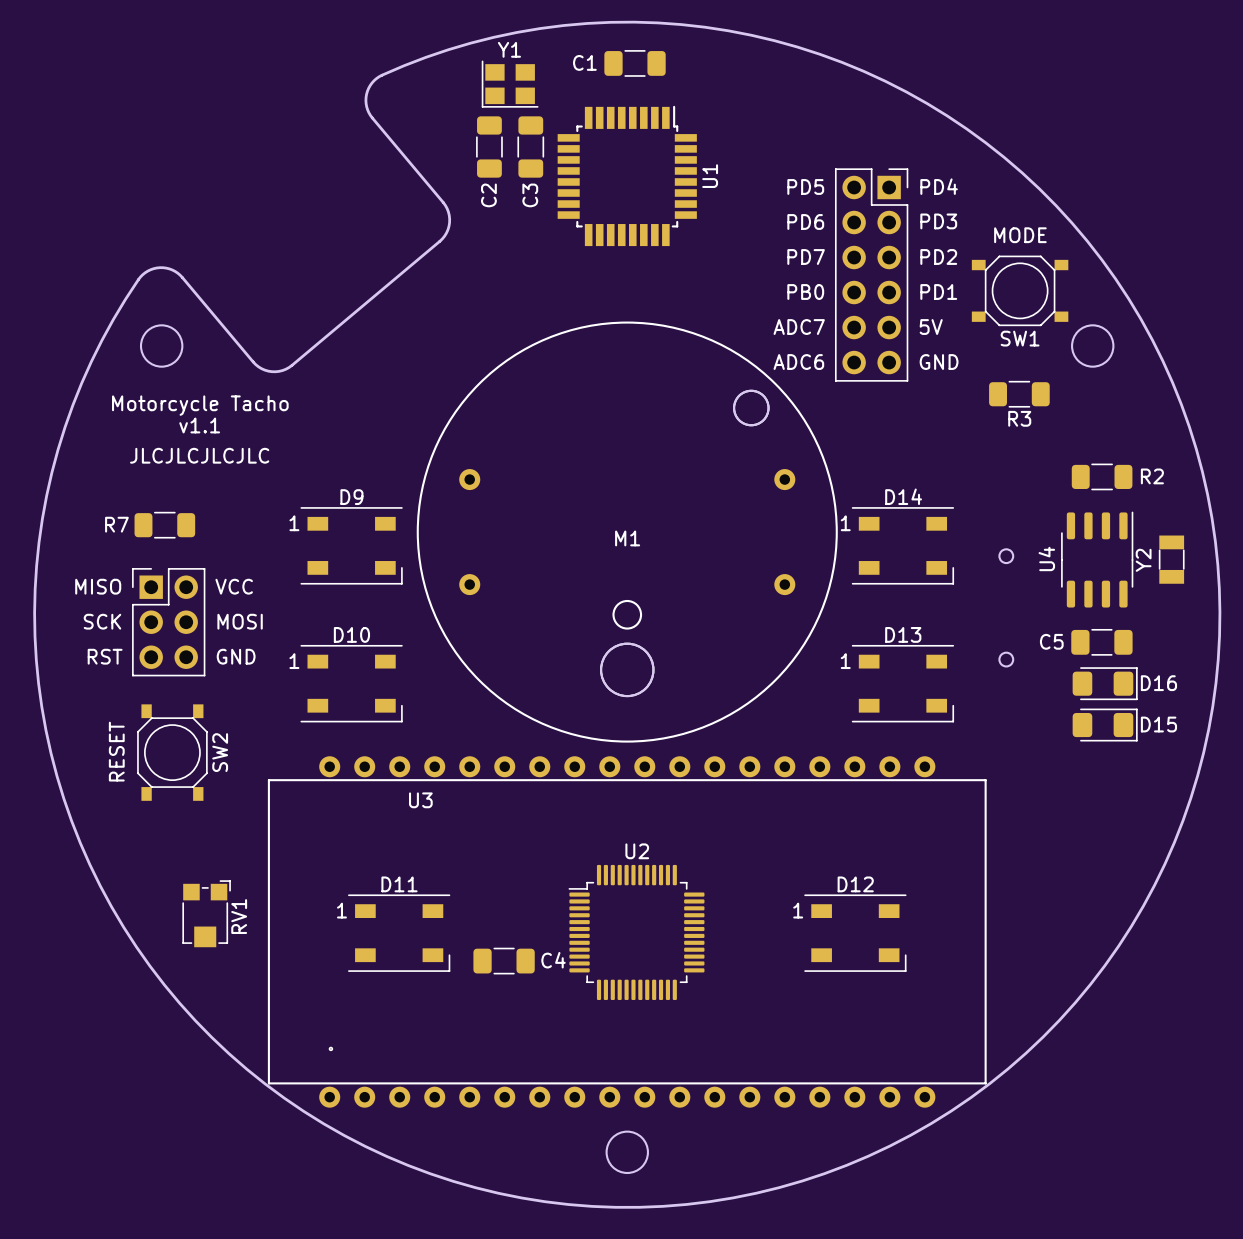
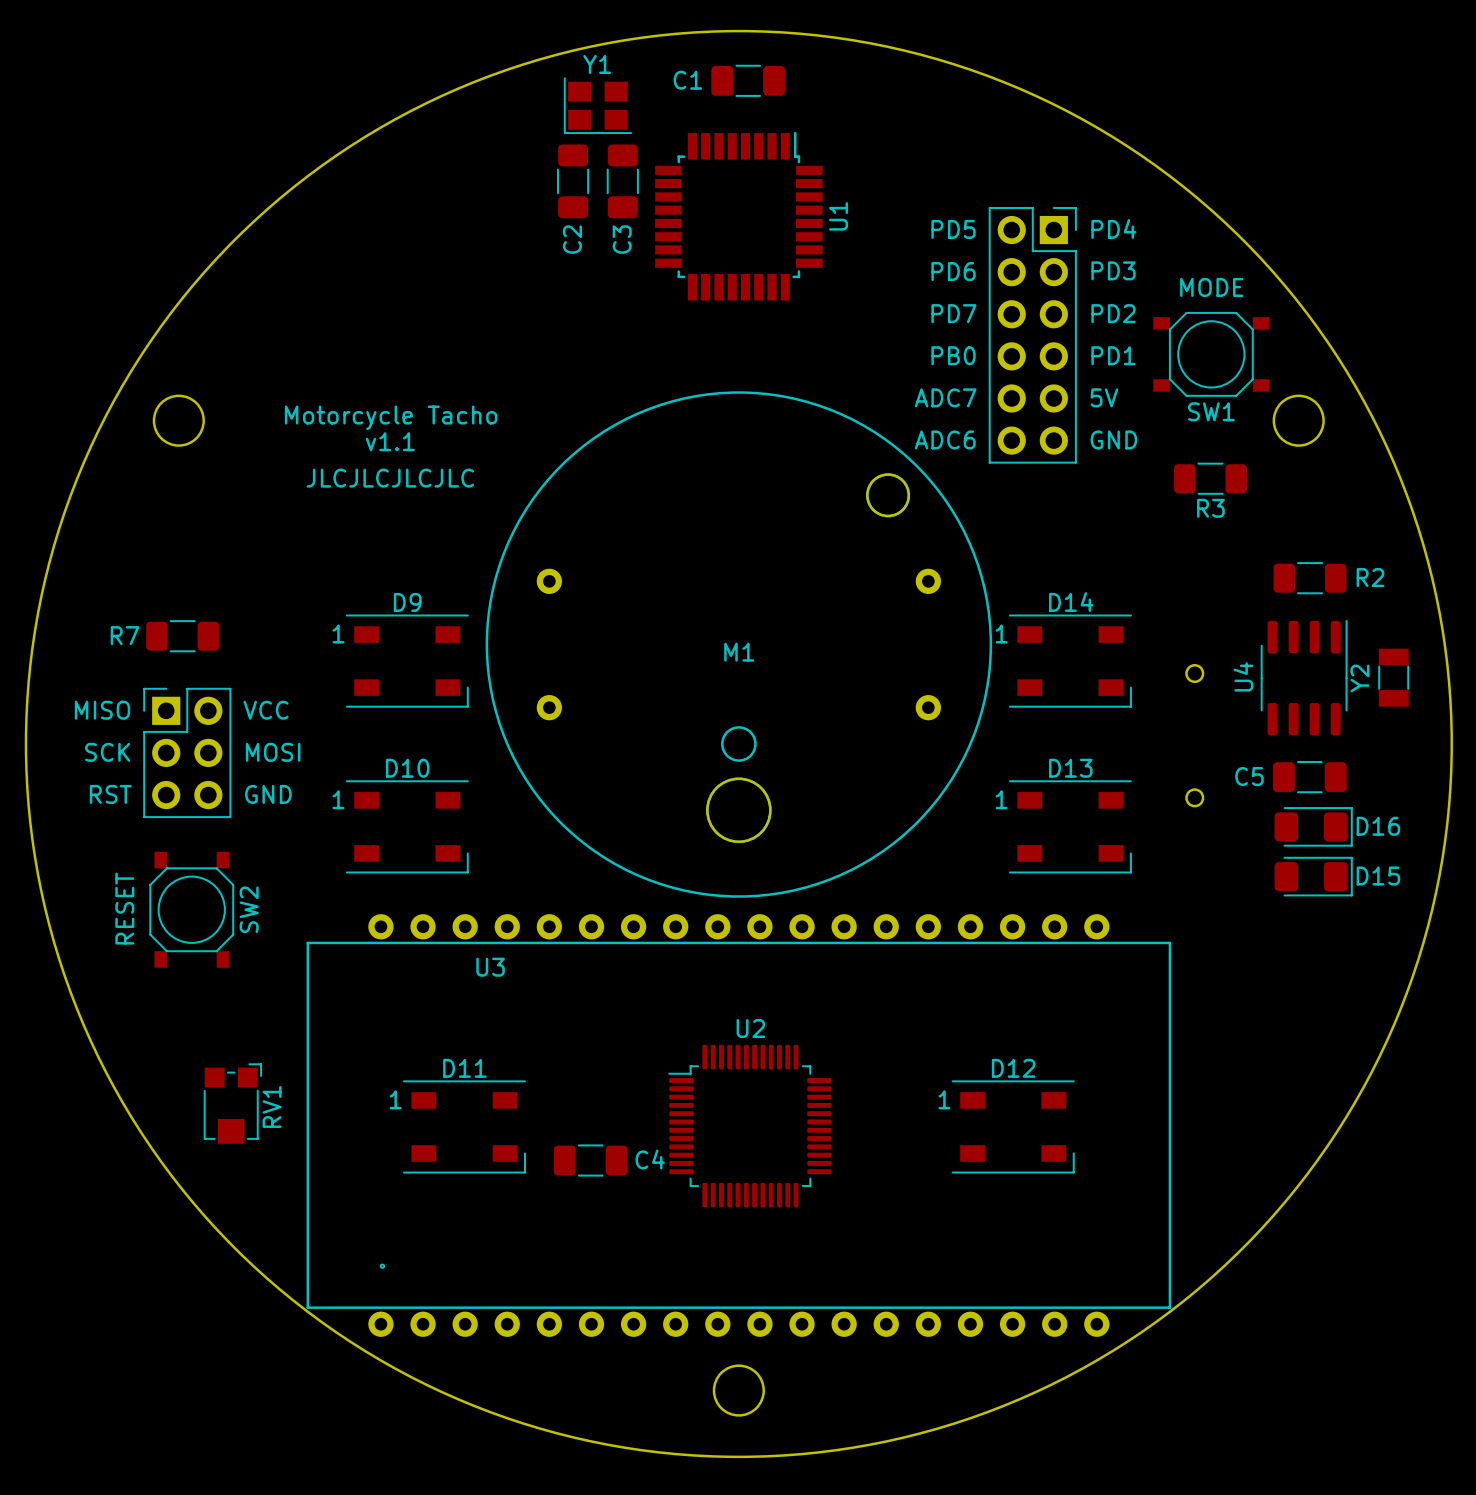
round board edge: none -> [24, 29, 1453, 1459]
board edge: (382, 75) (425, 57) (470, 43) (516, 32) (587, 23) (657, 22) (705, 27) (751, 35) (819, 54) (885, 81) (926, 103) (966, 128) (1022, 172) (1072, 223) (1101, 259) (1128, 298) (1162, 360) (1189, 426) (1202, 471) (1215, 541) (1219, 588) (1218, 659) (1212, 706) (1197, 775) (1183, 820) (1154, 885) (1131, 926) (1090, 984) (1059, 1020) (1026, 1053) (970, 1097) (910, 1135) (868, 1156) (824, 1173) (756, 1193) (710, 1201) (639, 1207) (592, 1206) (545, 1201) (498, 1193) (430, 1173) (365, 1146) (323, 1123) (265, 1084) (229, 1053) (195, 1020) (150, 966) (123, 927) (89, 864) (71, 821) (51, 753) (41, 707) (35, 636) (35, 589) (42, 518) (58, 449) (72, 404) (91, 361) (113, 319) (138, 279) (150, 269) (166, 268) (177, 273) (255, 364) (264, 370) (275, 371) (292, 365) (442, 238) (449, 222) (445, 205) (367, 109) (365, 100) (368, 88) (374, 80) (382, 75) -> none
text position: Motorcycle Tacho (200, 405) -> Motorcycle Tacho (391, 417)
text position: v1.1 (199, 425) -> v1.1 (390, 441)
text position: JLCJLCJLCJLC (199, 455) -> JLCJLCJLCJLC (390, 478)

